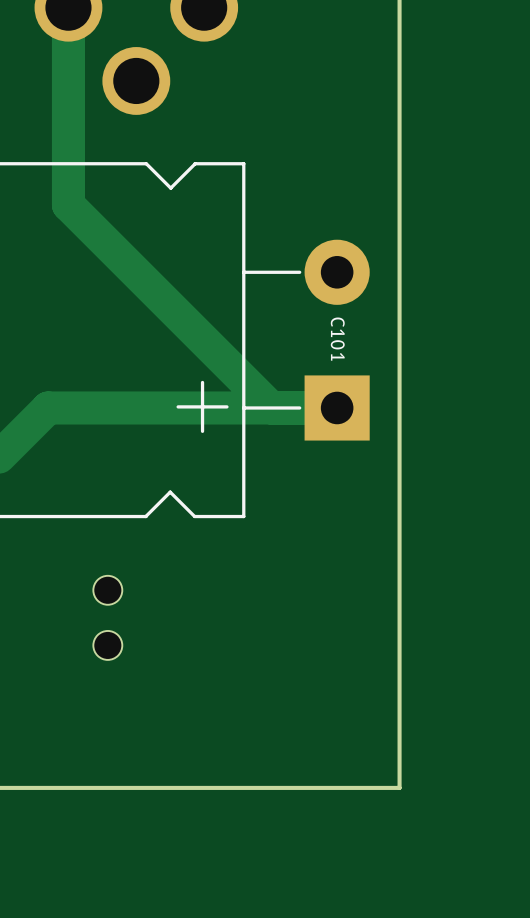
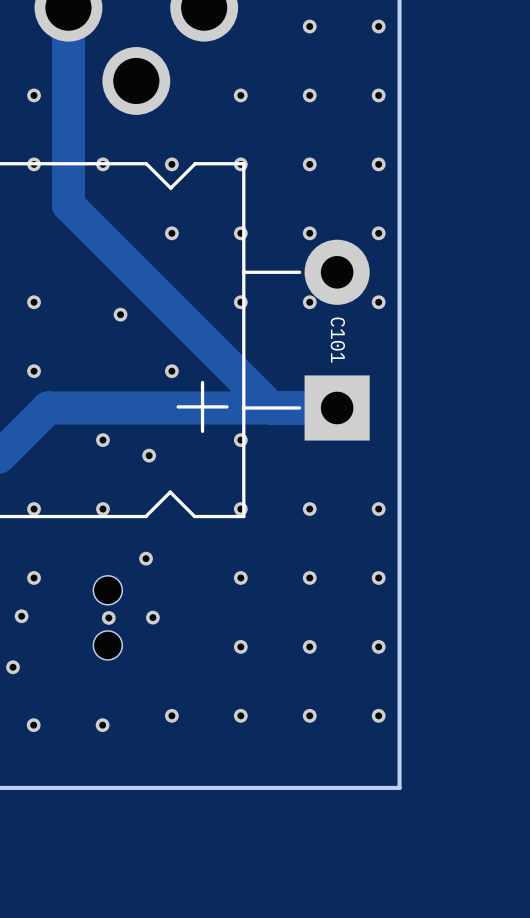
part: none -> (309, 26)
part: none -> (378, 26)
part: none -> (34, 95)
part: none -> (240, 95)
part: none -> (309, 95)
part: none -> (378, 95)
part: none -> (34, 164)
part: none -> (102, 164)
part: none -> (171, 164)
part: none -> (240, 164)
part: none -> (309, 164)
part: none -> (378, 164)
part: none -> (171, 233)
part: none -> (240, 233)
part: none -> (309, 233)
part: none -> (378, 233)
part: none -> (34, 302)
part: none -> (240, 302)
part: none -> (309, 302)
part: none -> (378, 302)
part: none -> (120, 314)
part: none -> (34, 371)
part: none -> (171, 371)
part: none -> (102, 440)
part: none -> (240, 440)
part: none -> (149, 455)
part: none -> (34, 509)
part: none -> (102, 509)
part: none -> (240, 509)
part: none -> (309, 509)
part: none -> (378, 509)
part: none -> (146, 558)
part: none -> (34, 577)
part: none -> (240, 577)
part: none -> (309, 577)
part: none -> (378, 577)
part: none -> (21, 616)
part: none -> (108, 617)
part: none -> (152, 617)
part: none -> (240, 646)
part: none -> (309, 646)
part: none -> (378, 646)
part: none -> (13, 667)
part: none -> (171, 715)
part: none -> (240, 715)
part: none -> (309, 715)
part: none -> (378, 715)
part: none -> (33, 725)
part: none -> (102, 725)

